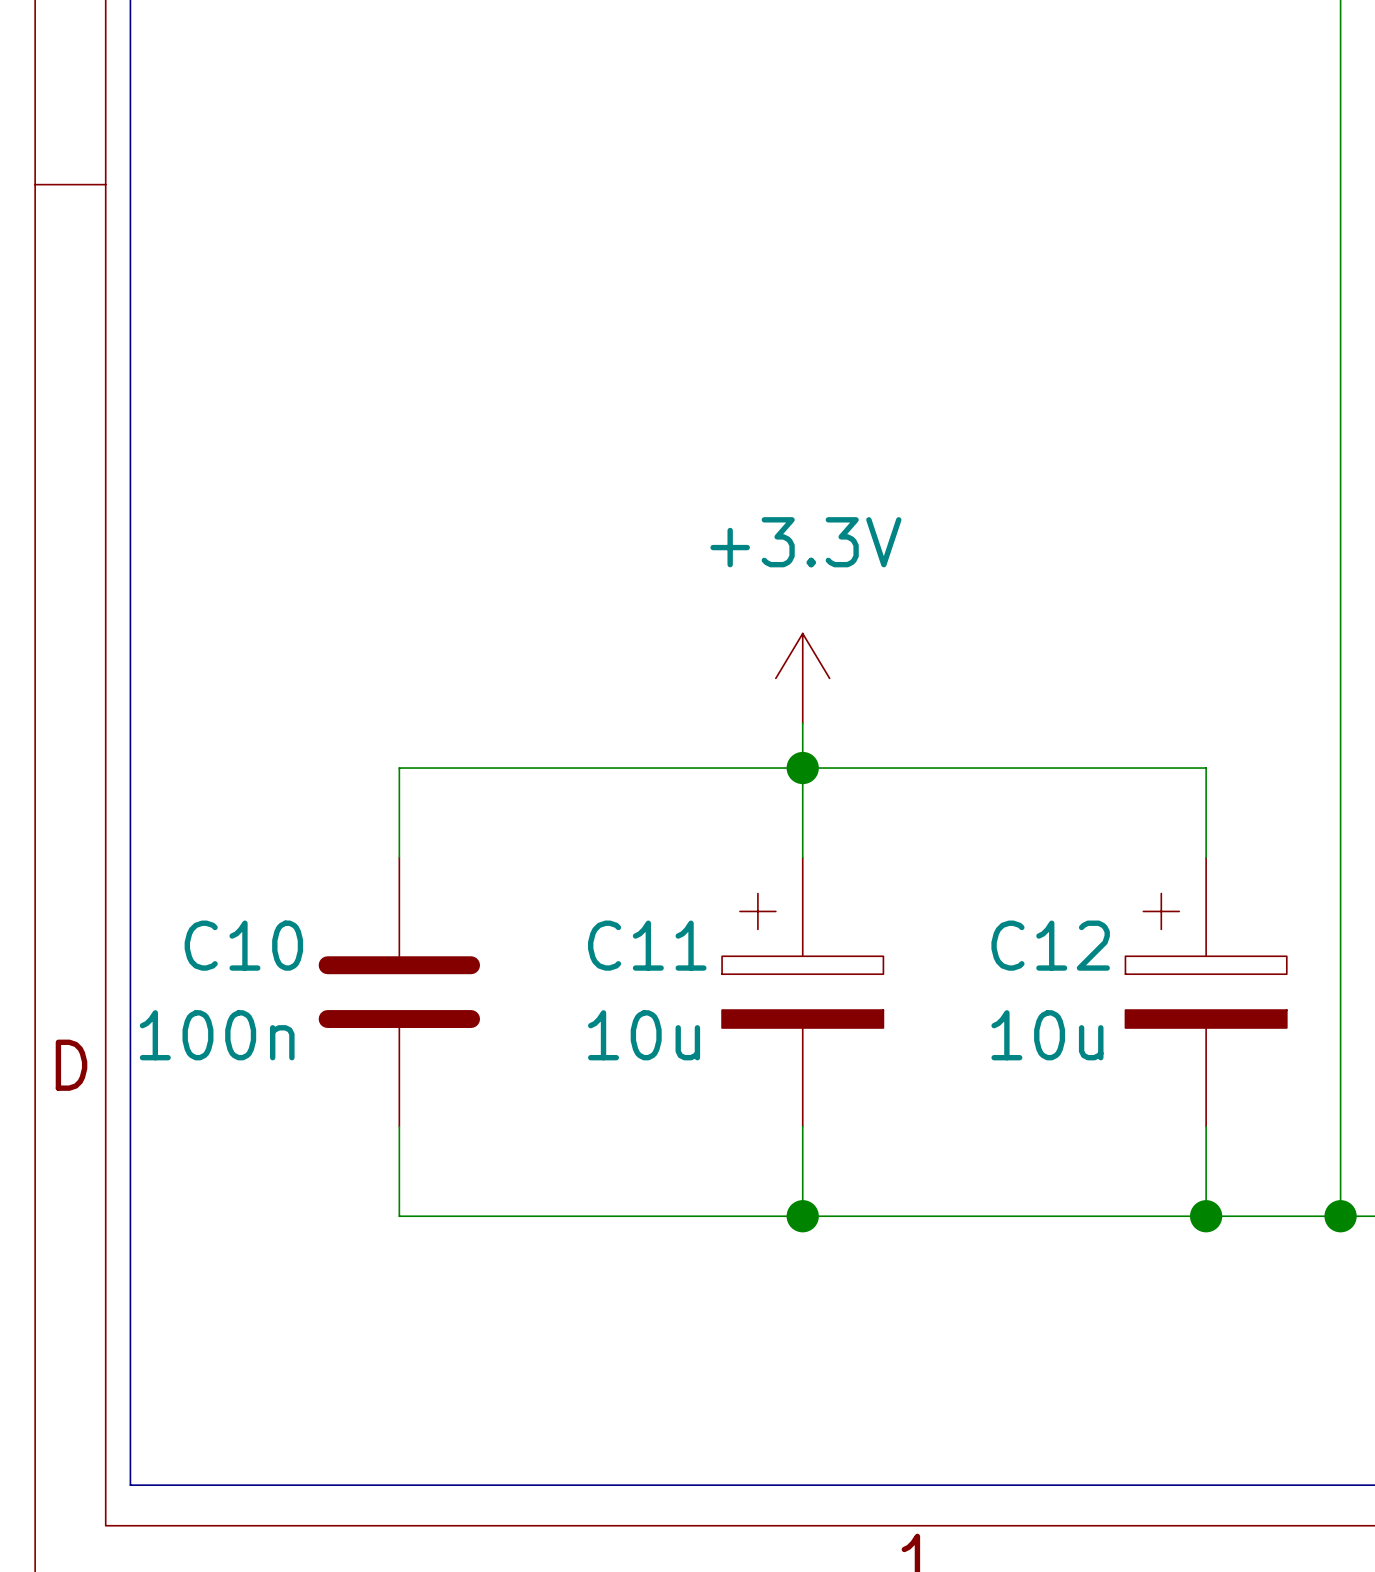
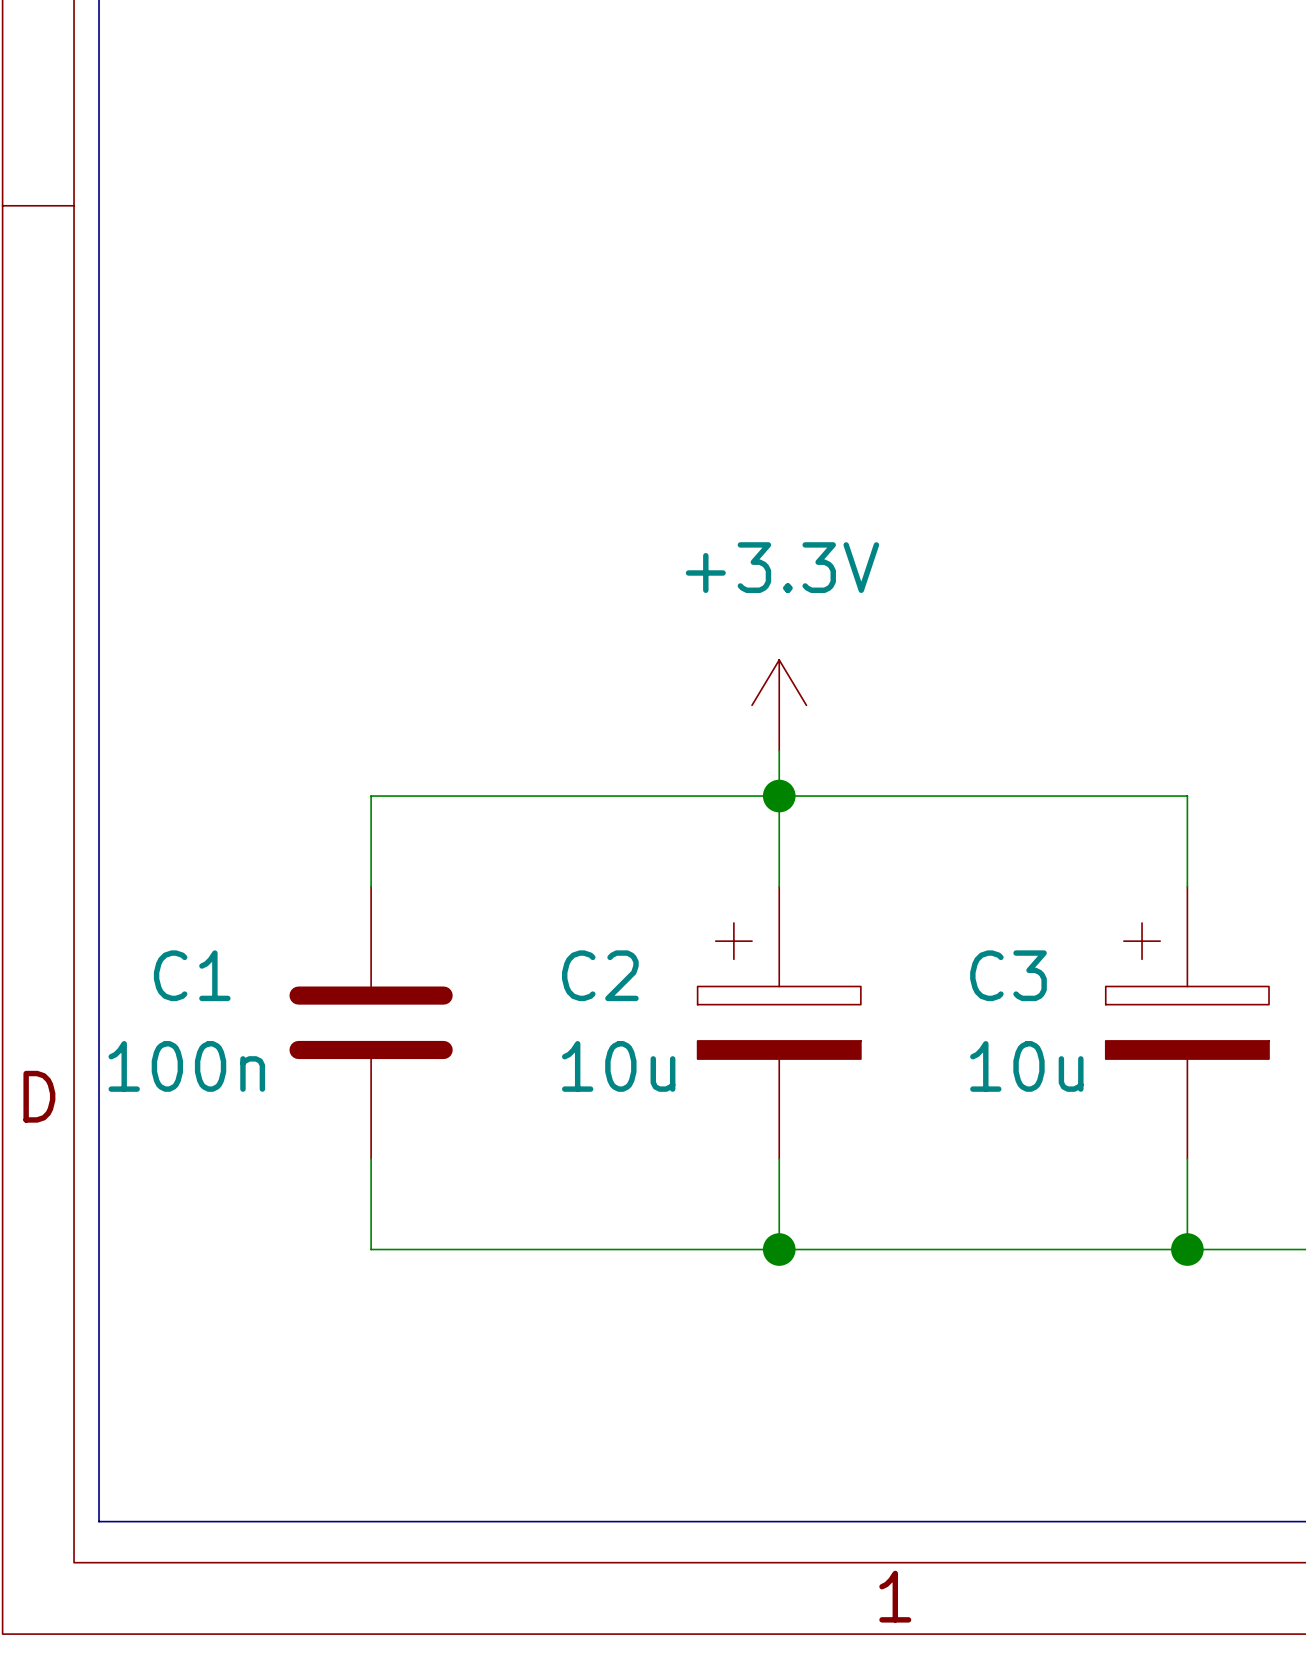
C10 name: C10 (243, 945) -> C1 (192, 975)
C11 name: C11 (647, 945) -> C2 (600, 975)
C12 name: C12 (1050, 945) -> C3 (1008, 975)

